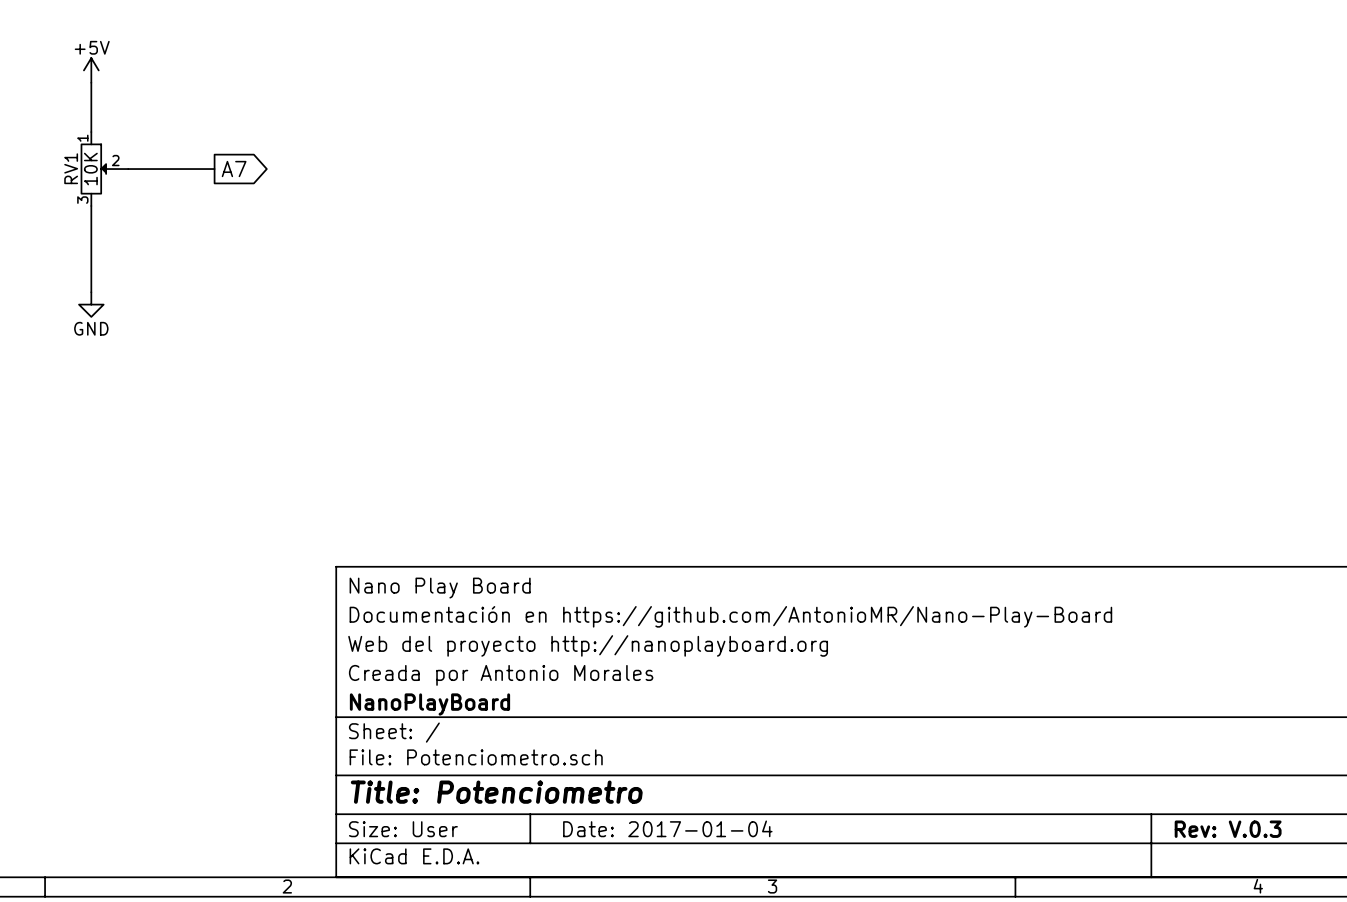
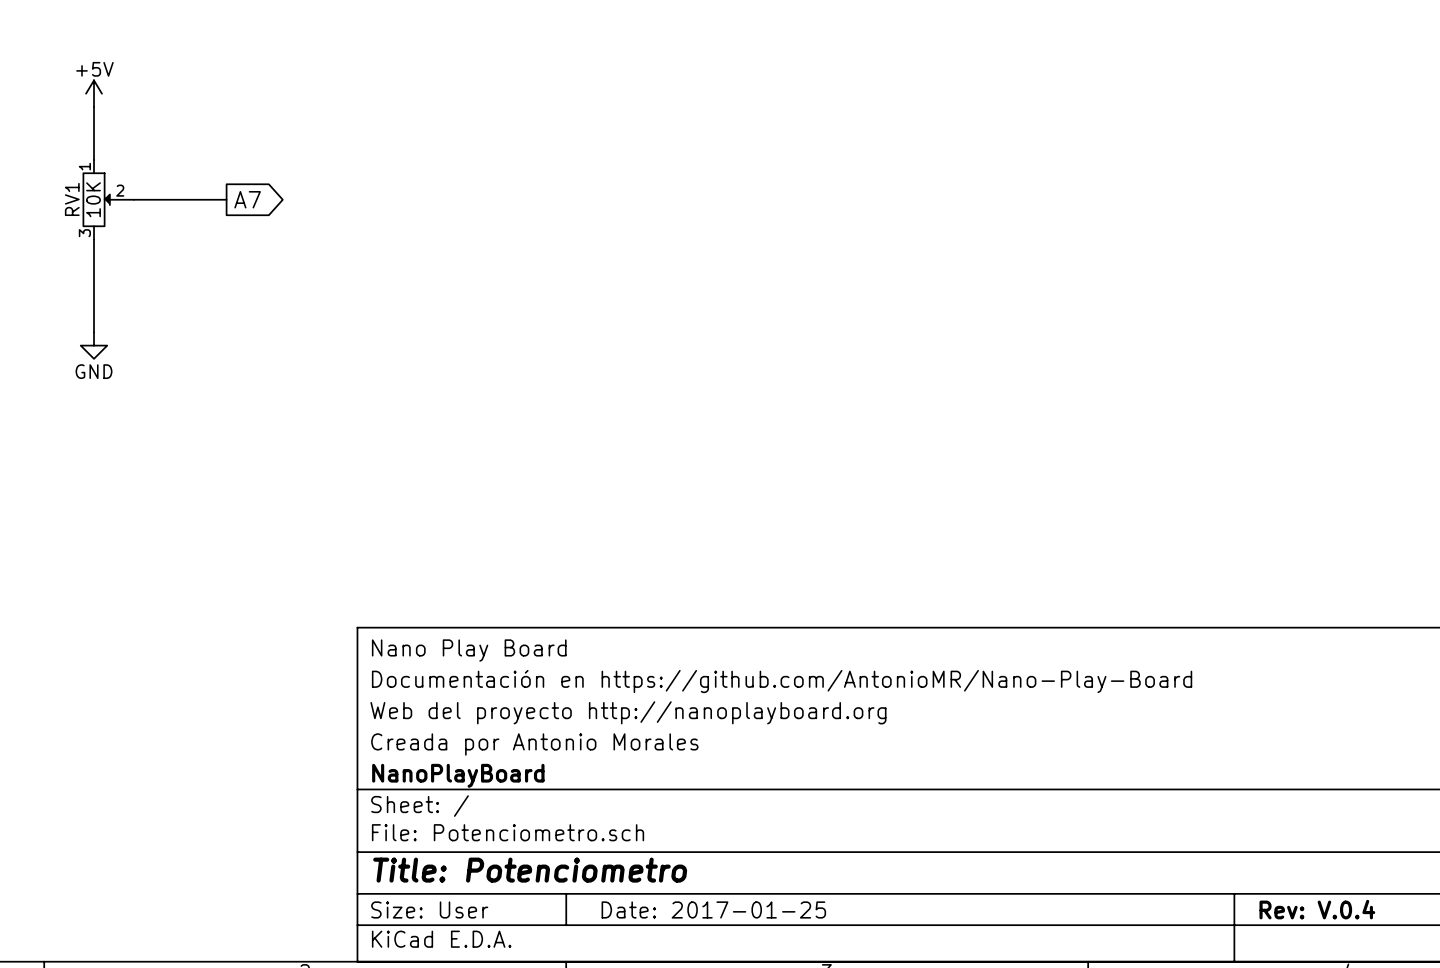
title block: Date: 2017-01-04 (667, 828) -> Date: 2017-01-25 (713, 909)
title block: Rev: V.0.3 (1228, 829) -> Rev: V.0.4 (1317, 909)

